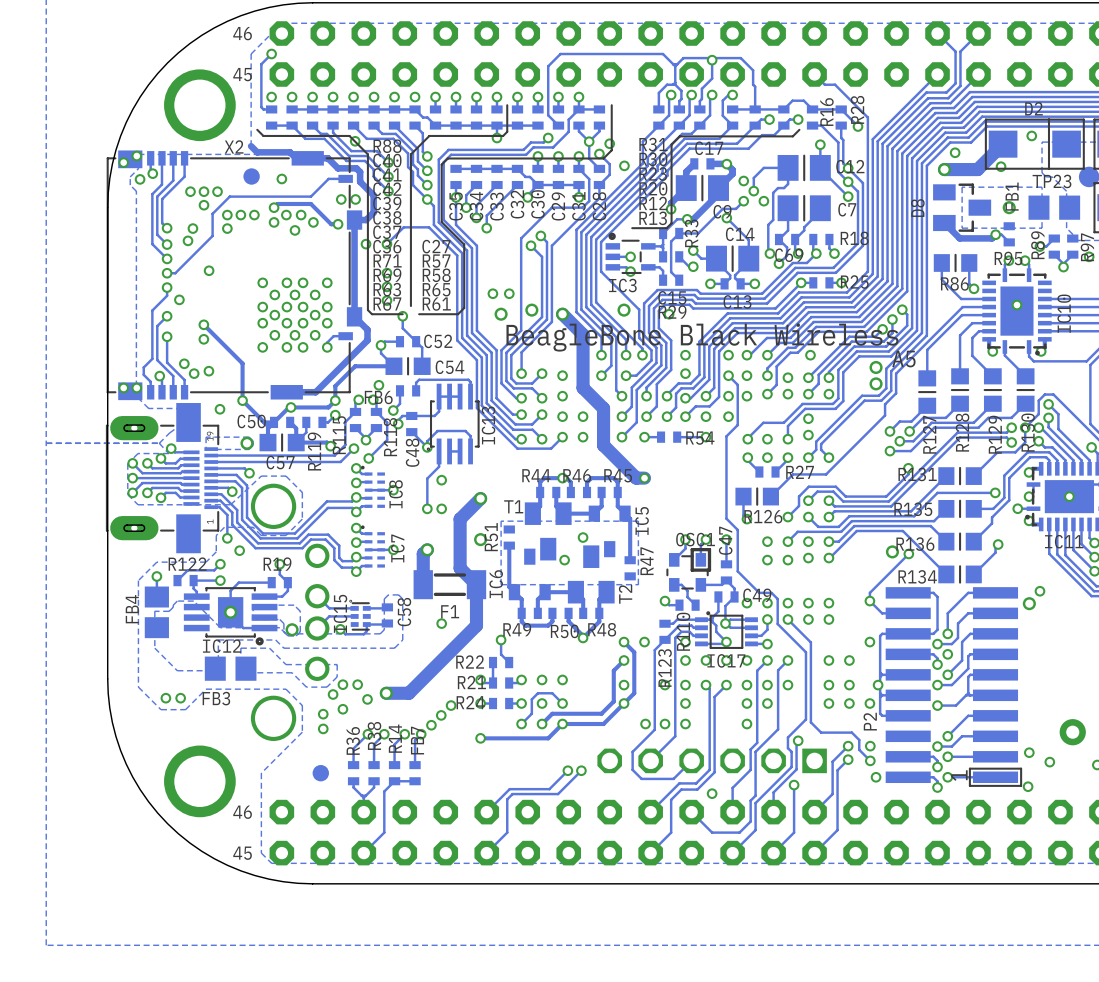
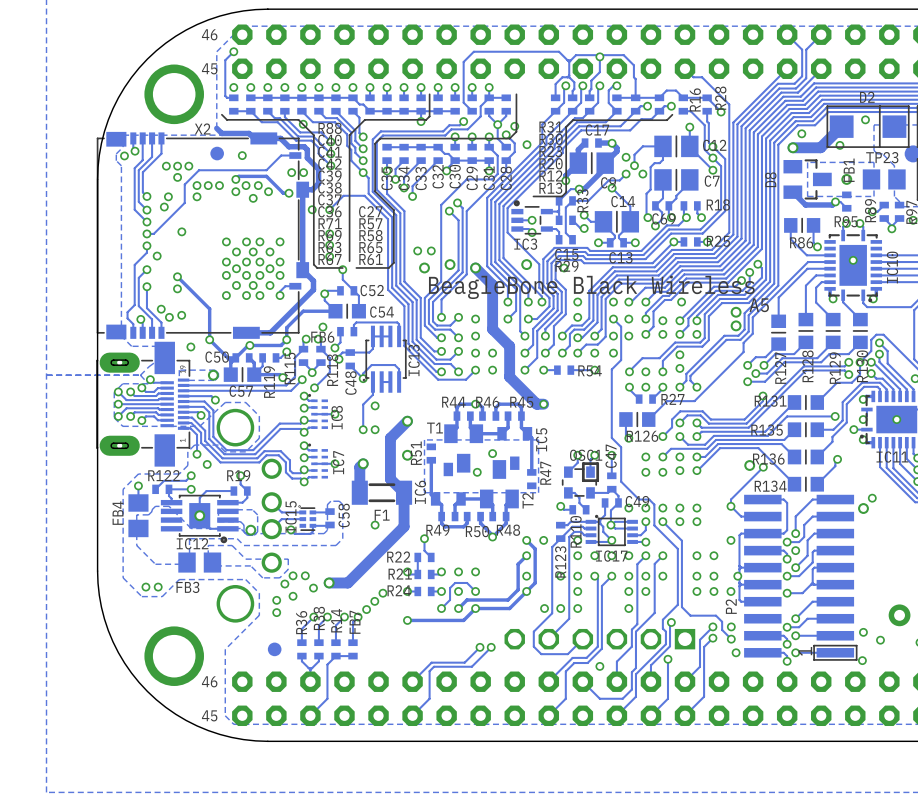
via: (136, 156) -> none
via: (123, 162) -> none
via: (123, 387) -> none
via: (136, 387) -> none

